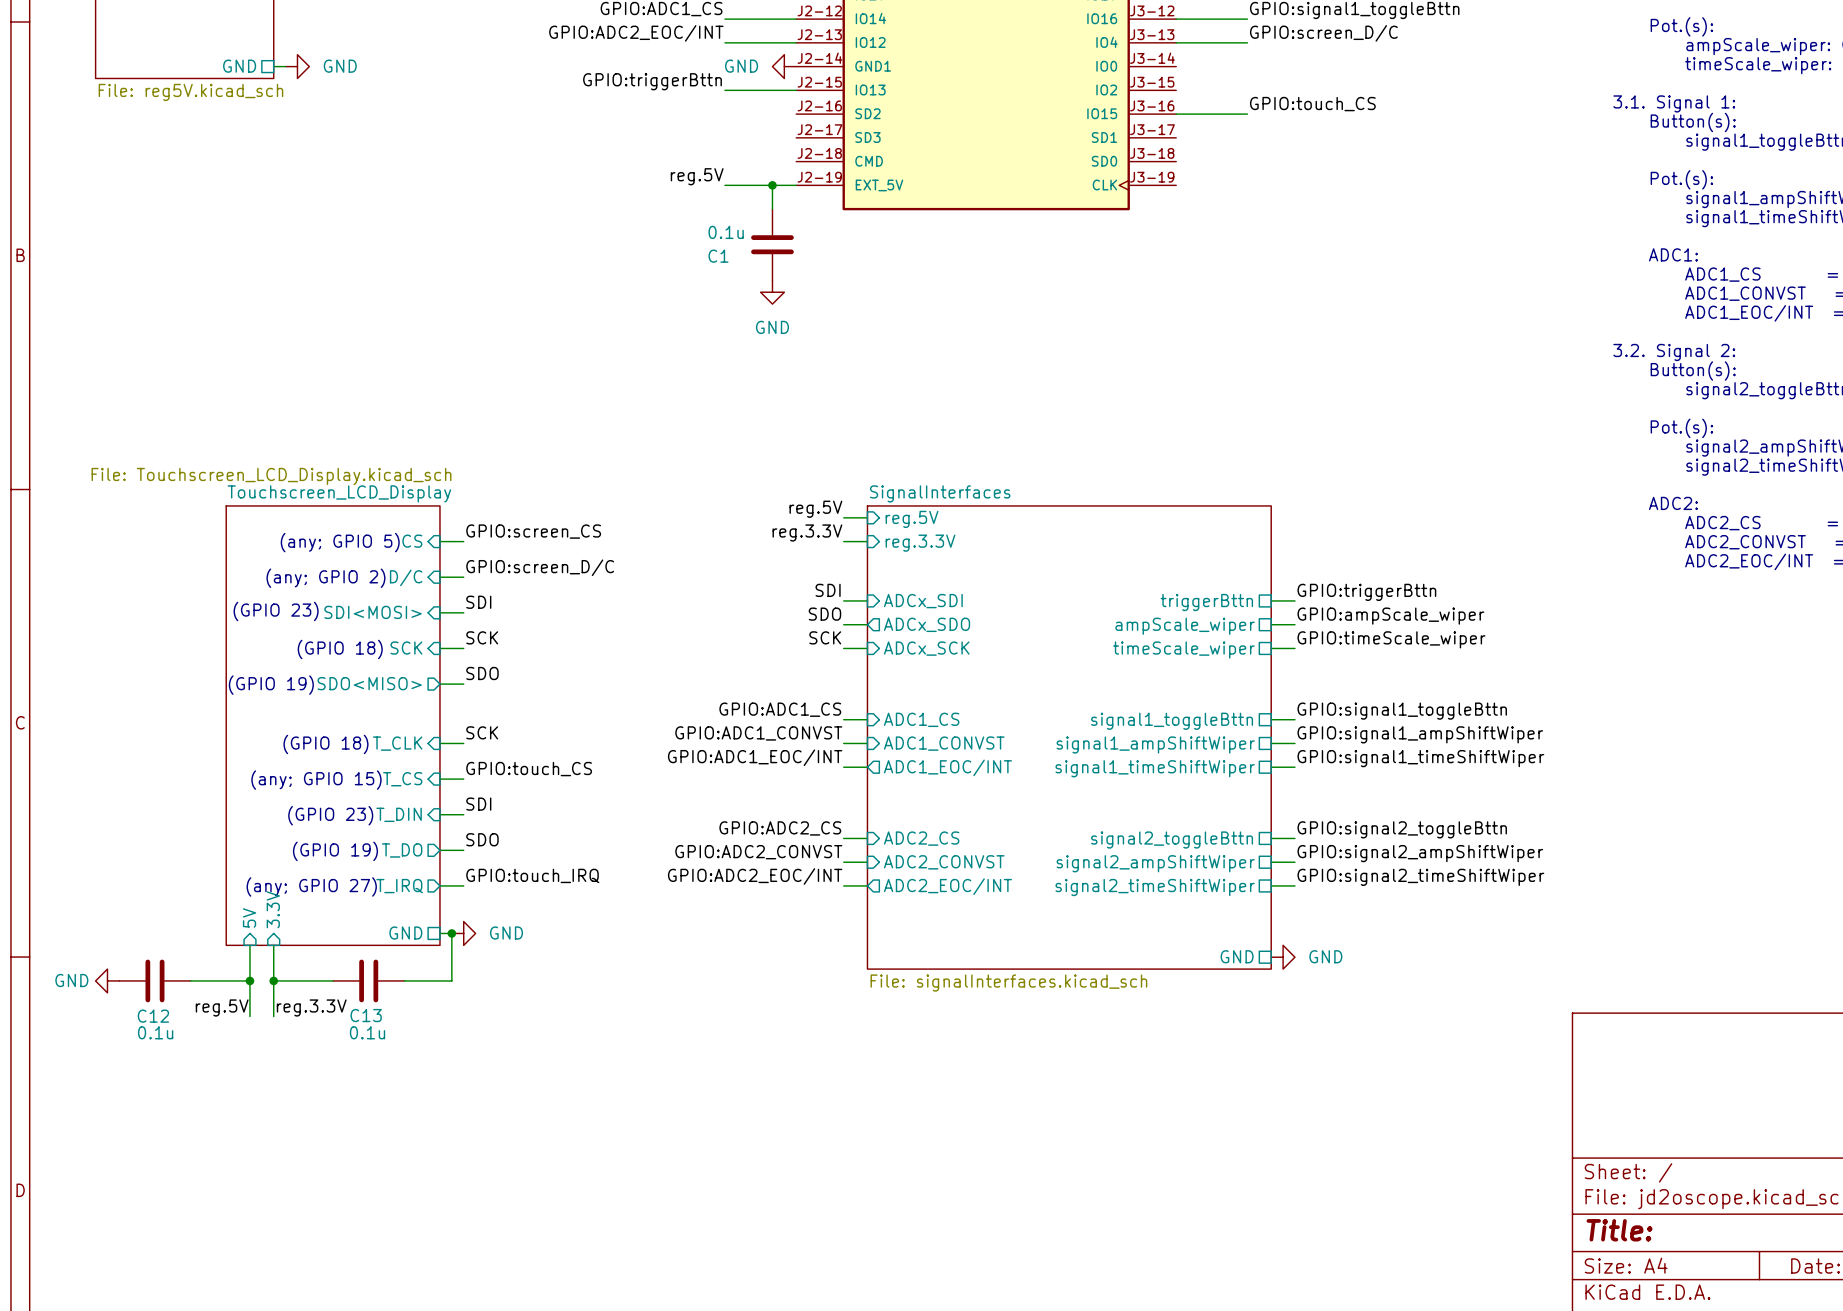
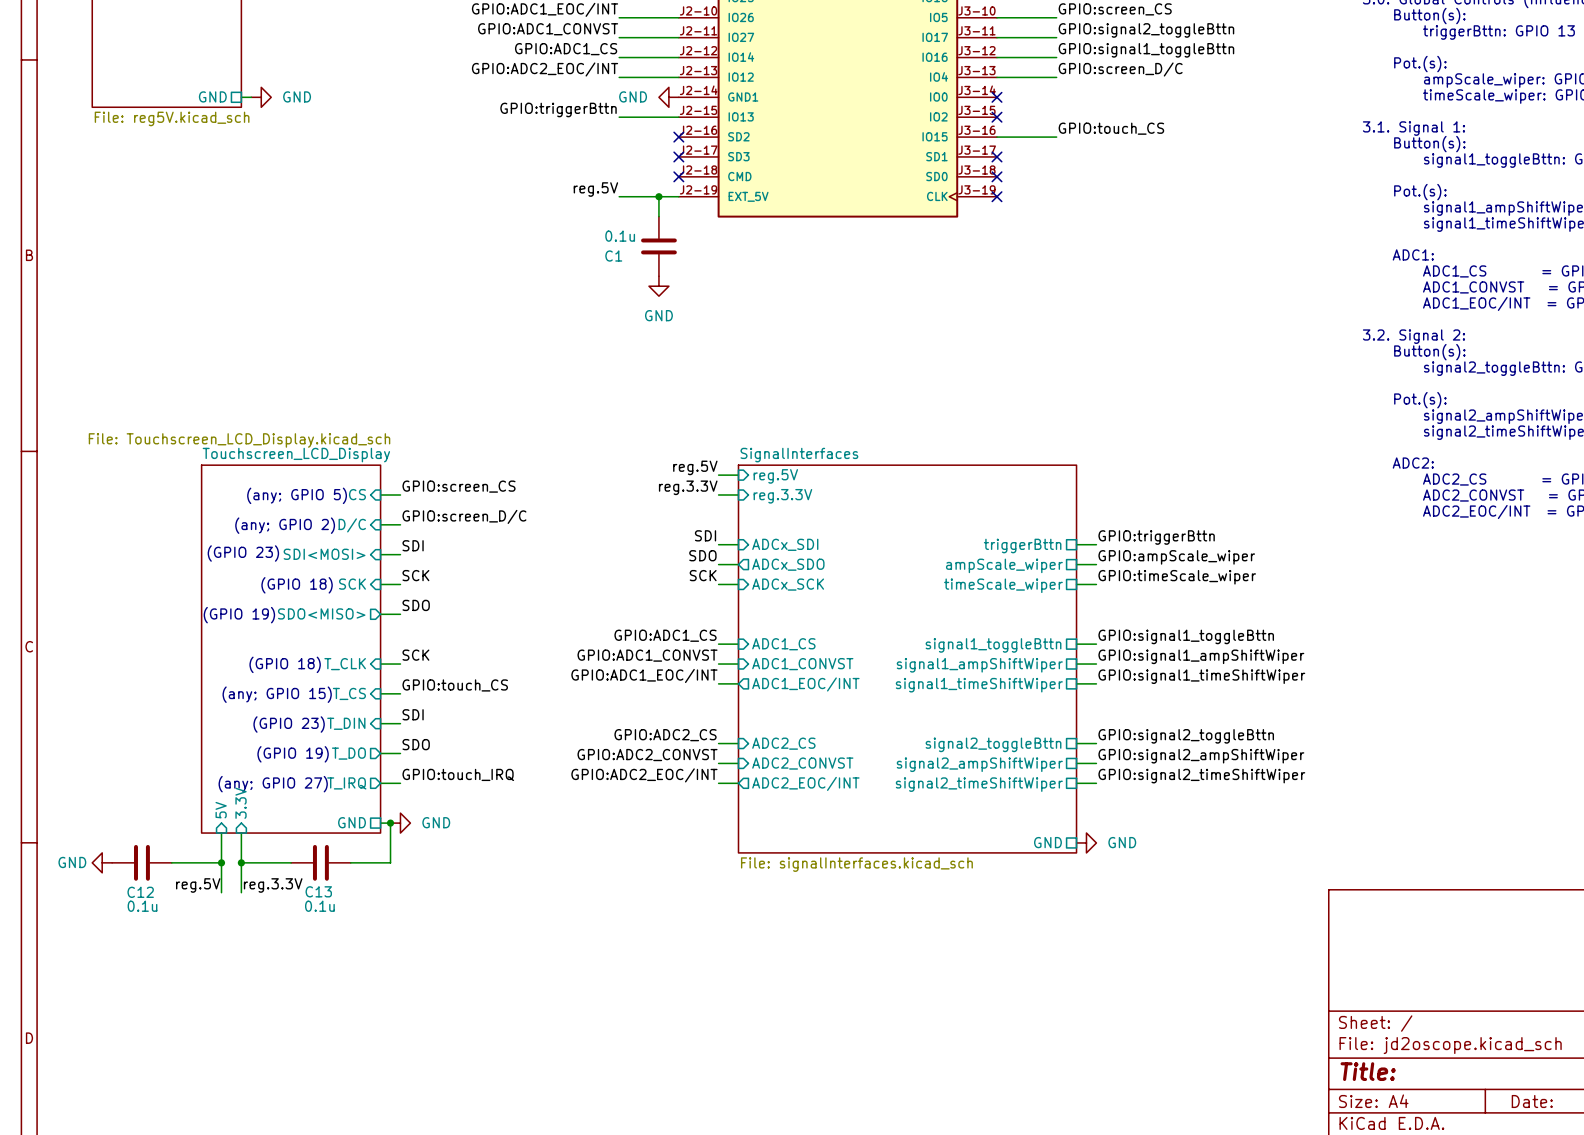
no-connect mark: none -> (996, 97)
no-connect mark: none -> (996, 117)
no-connect mark: none -> (678, 137)
no-connect mark: none -> (678, 156)
no-connect mark: none -> (996, 156)
no-connect mark: none -> (678, 176)
no-connect mark: none -> (996, 176)
no-connect mark: none -> (996, 196)

